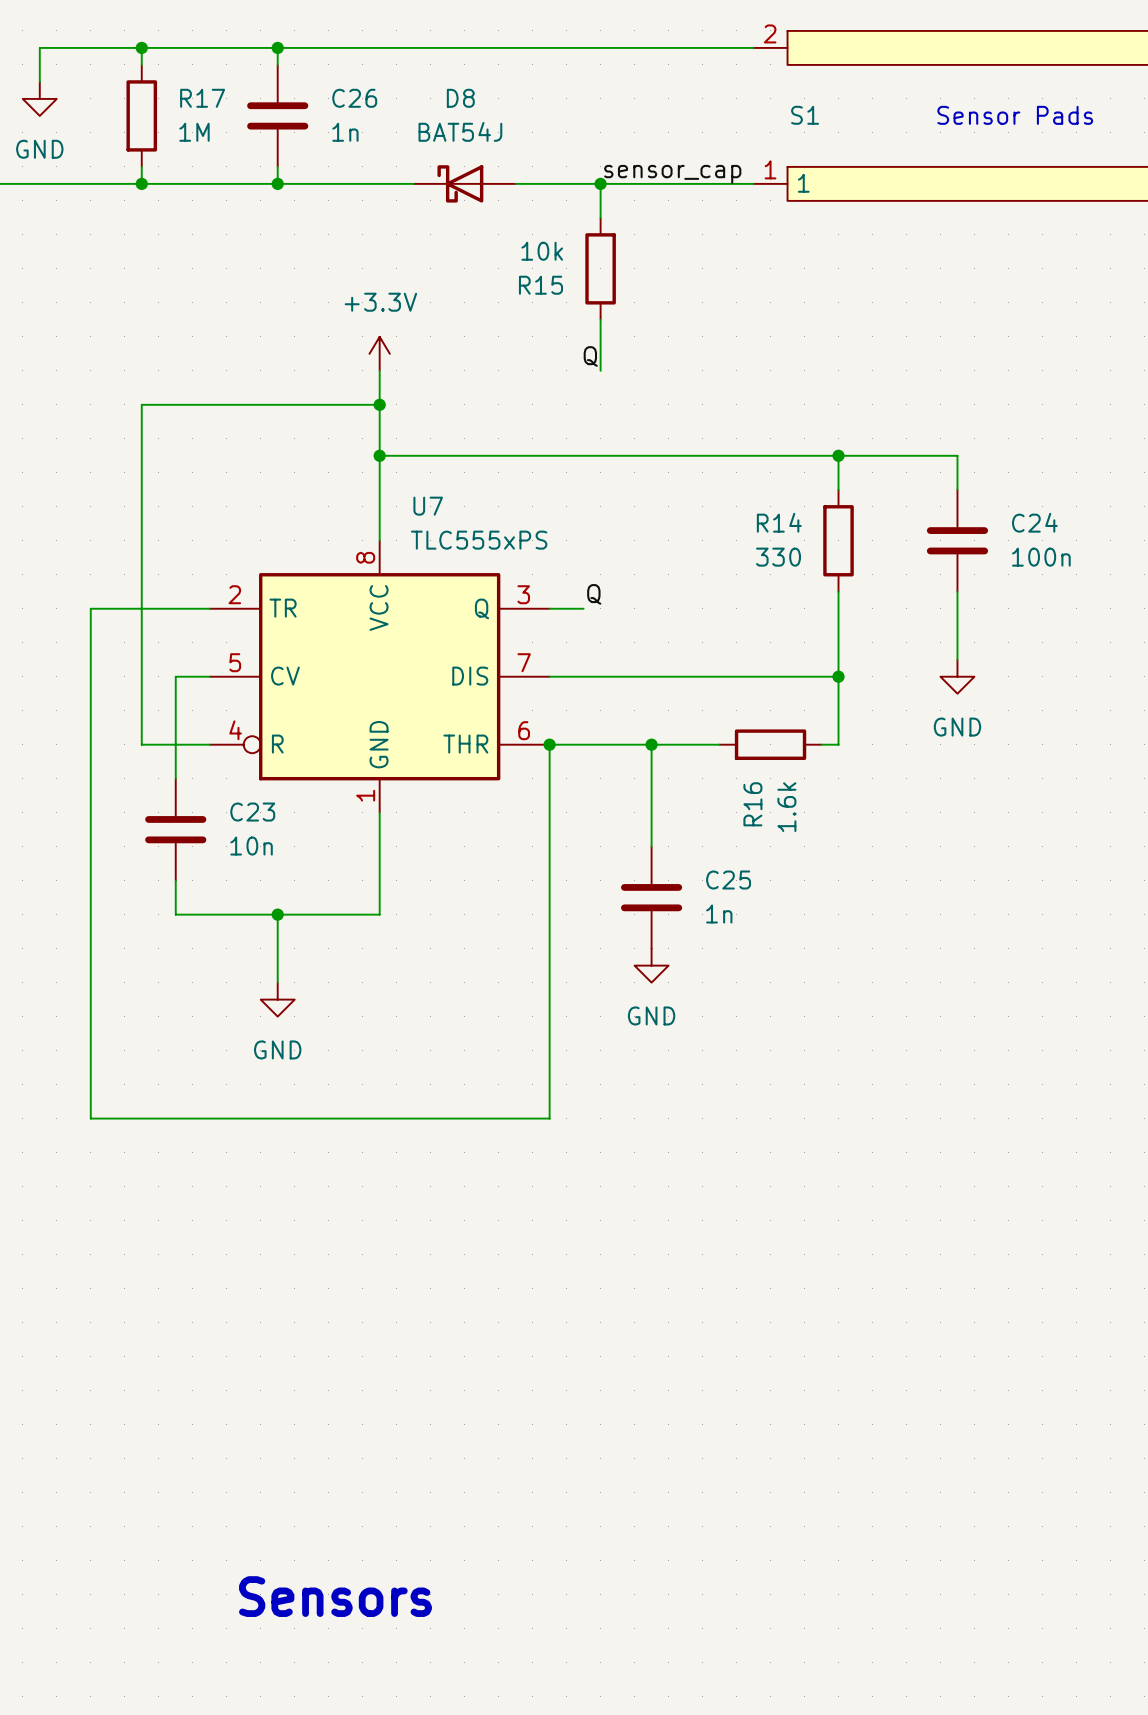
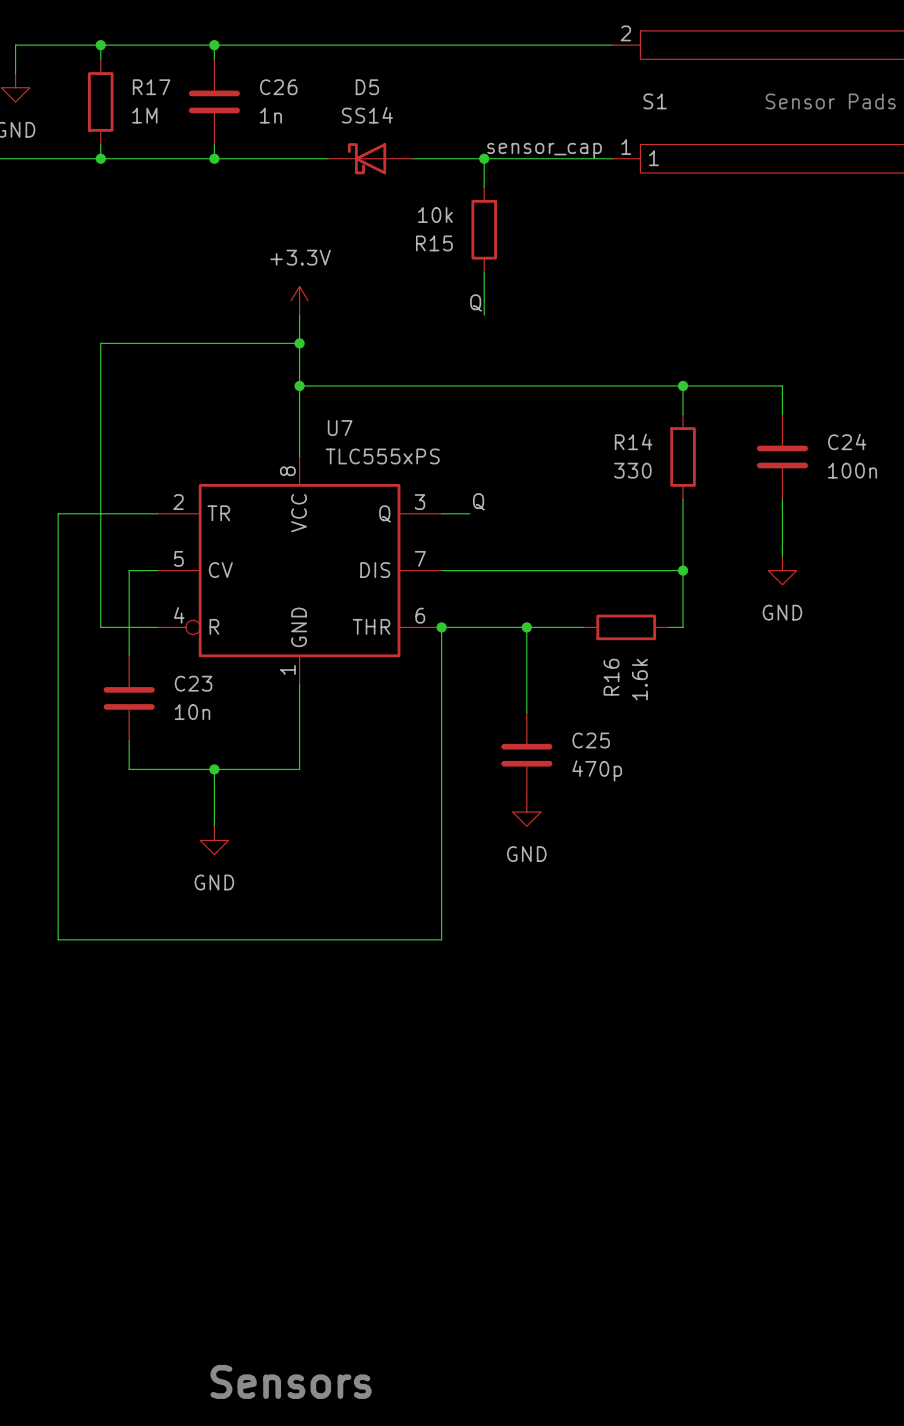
D8 name: D8 (460, 98) -> D5 (367, 87)
D8 value: BAT54J (460, 131) -> SS14 (367, 115)
C25 value: 1n (719, 914) -> 470p (597, 770)
text position: Sensors (335, 1596) -> Sensors (291, 1381)

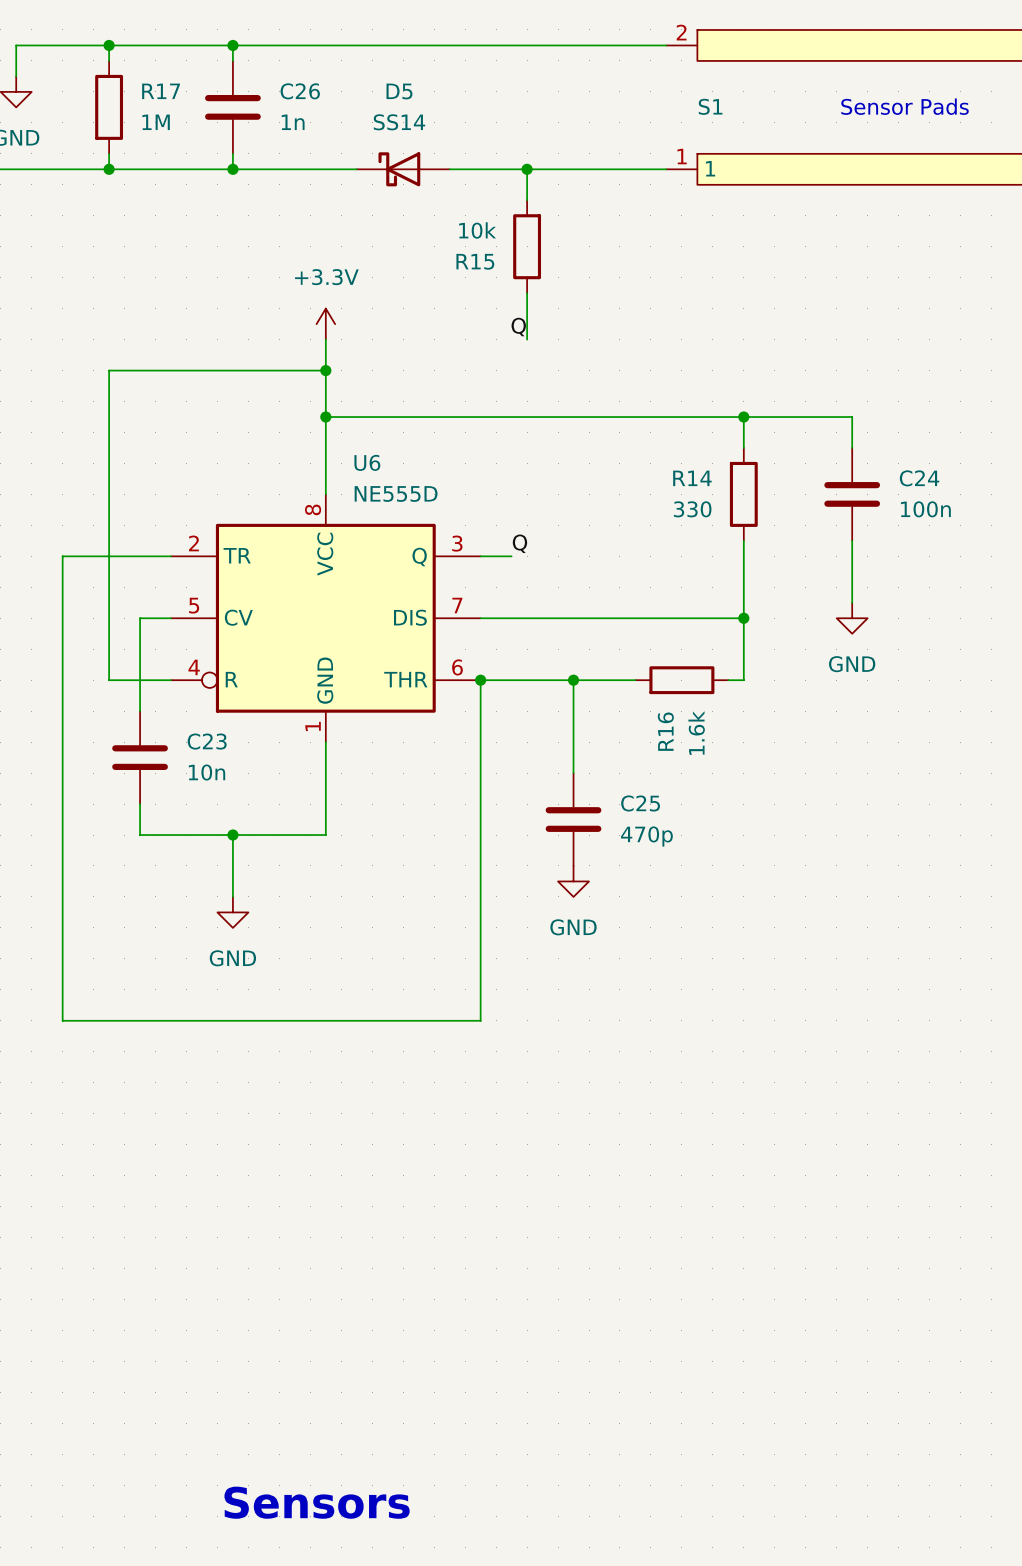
label: sensor_cap (544, 150) -> none
U7 name: U7 (340, 428) -> U6 (367, 462)
U7 value: TLC555xPS (382, 456) -> NE555D (396, 493)

